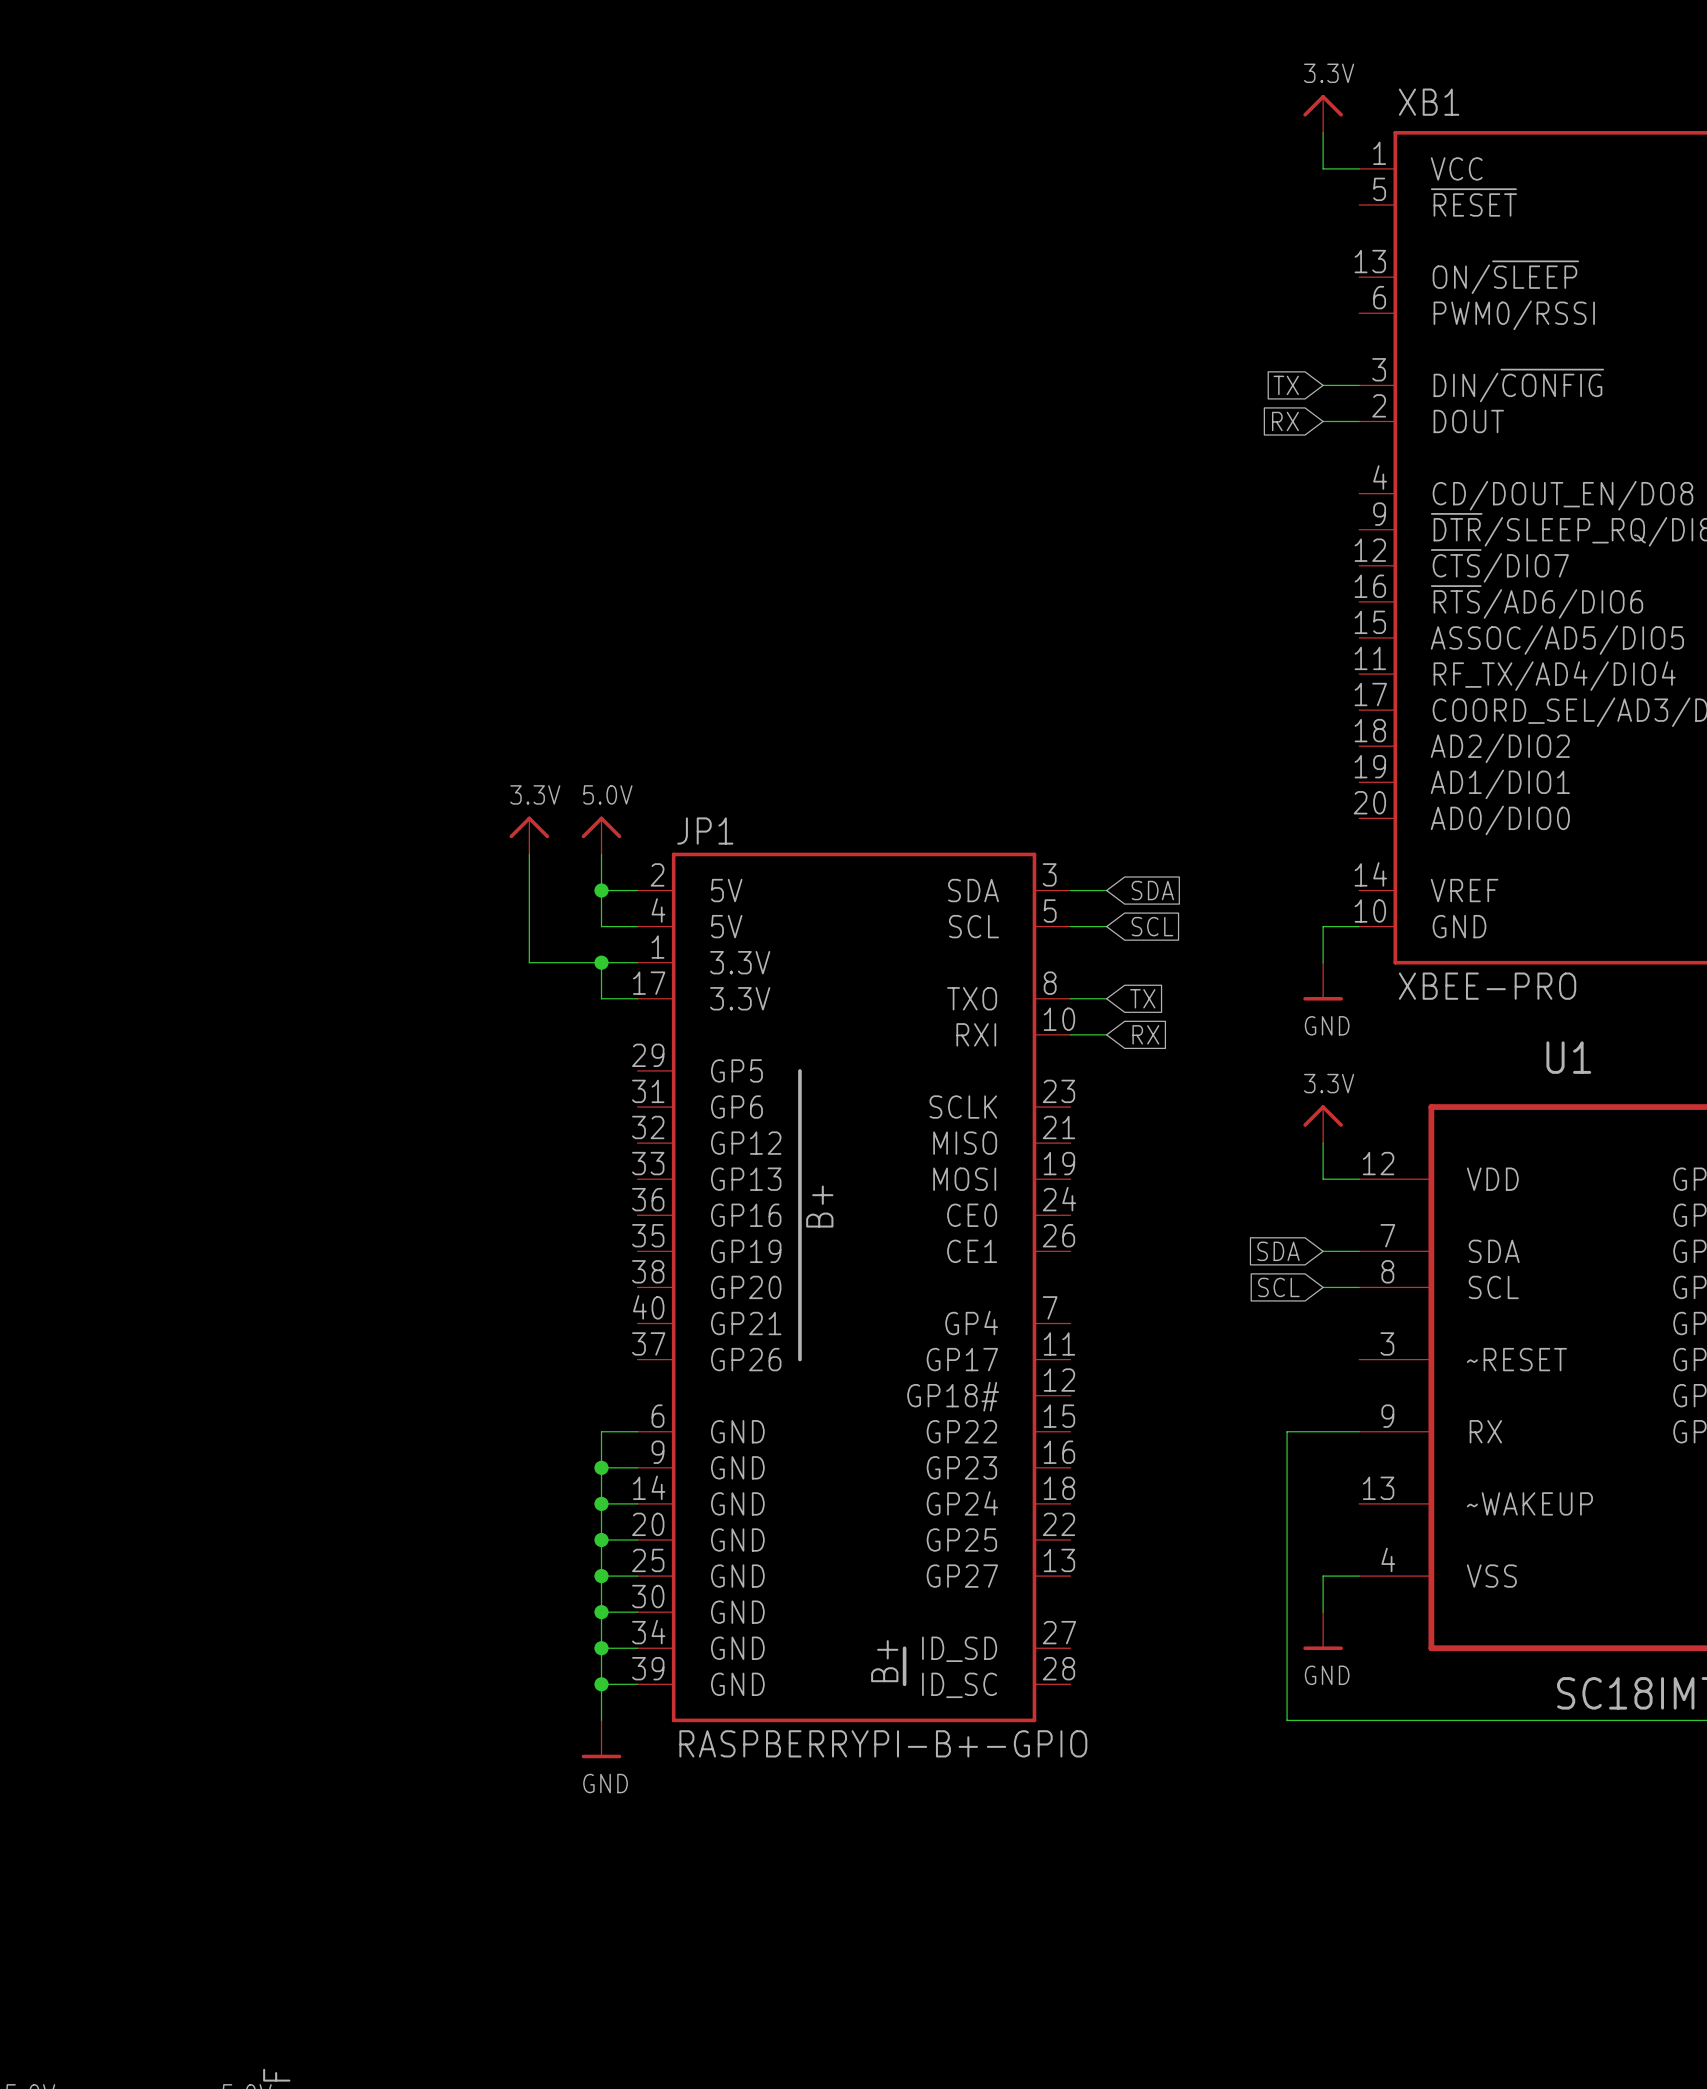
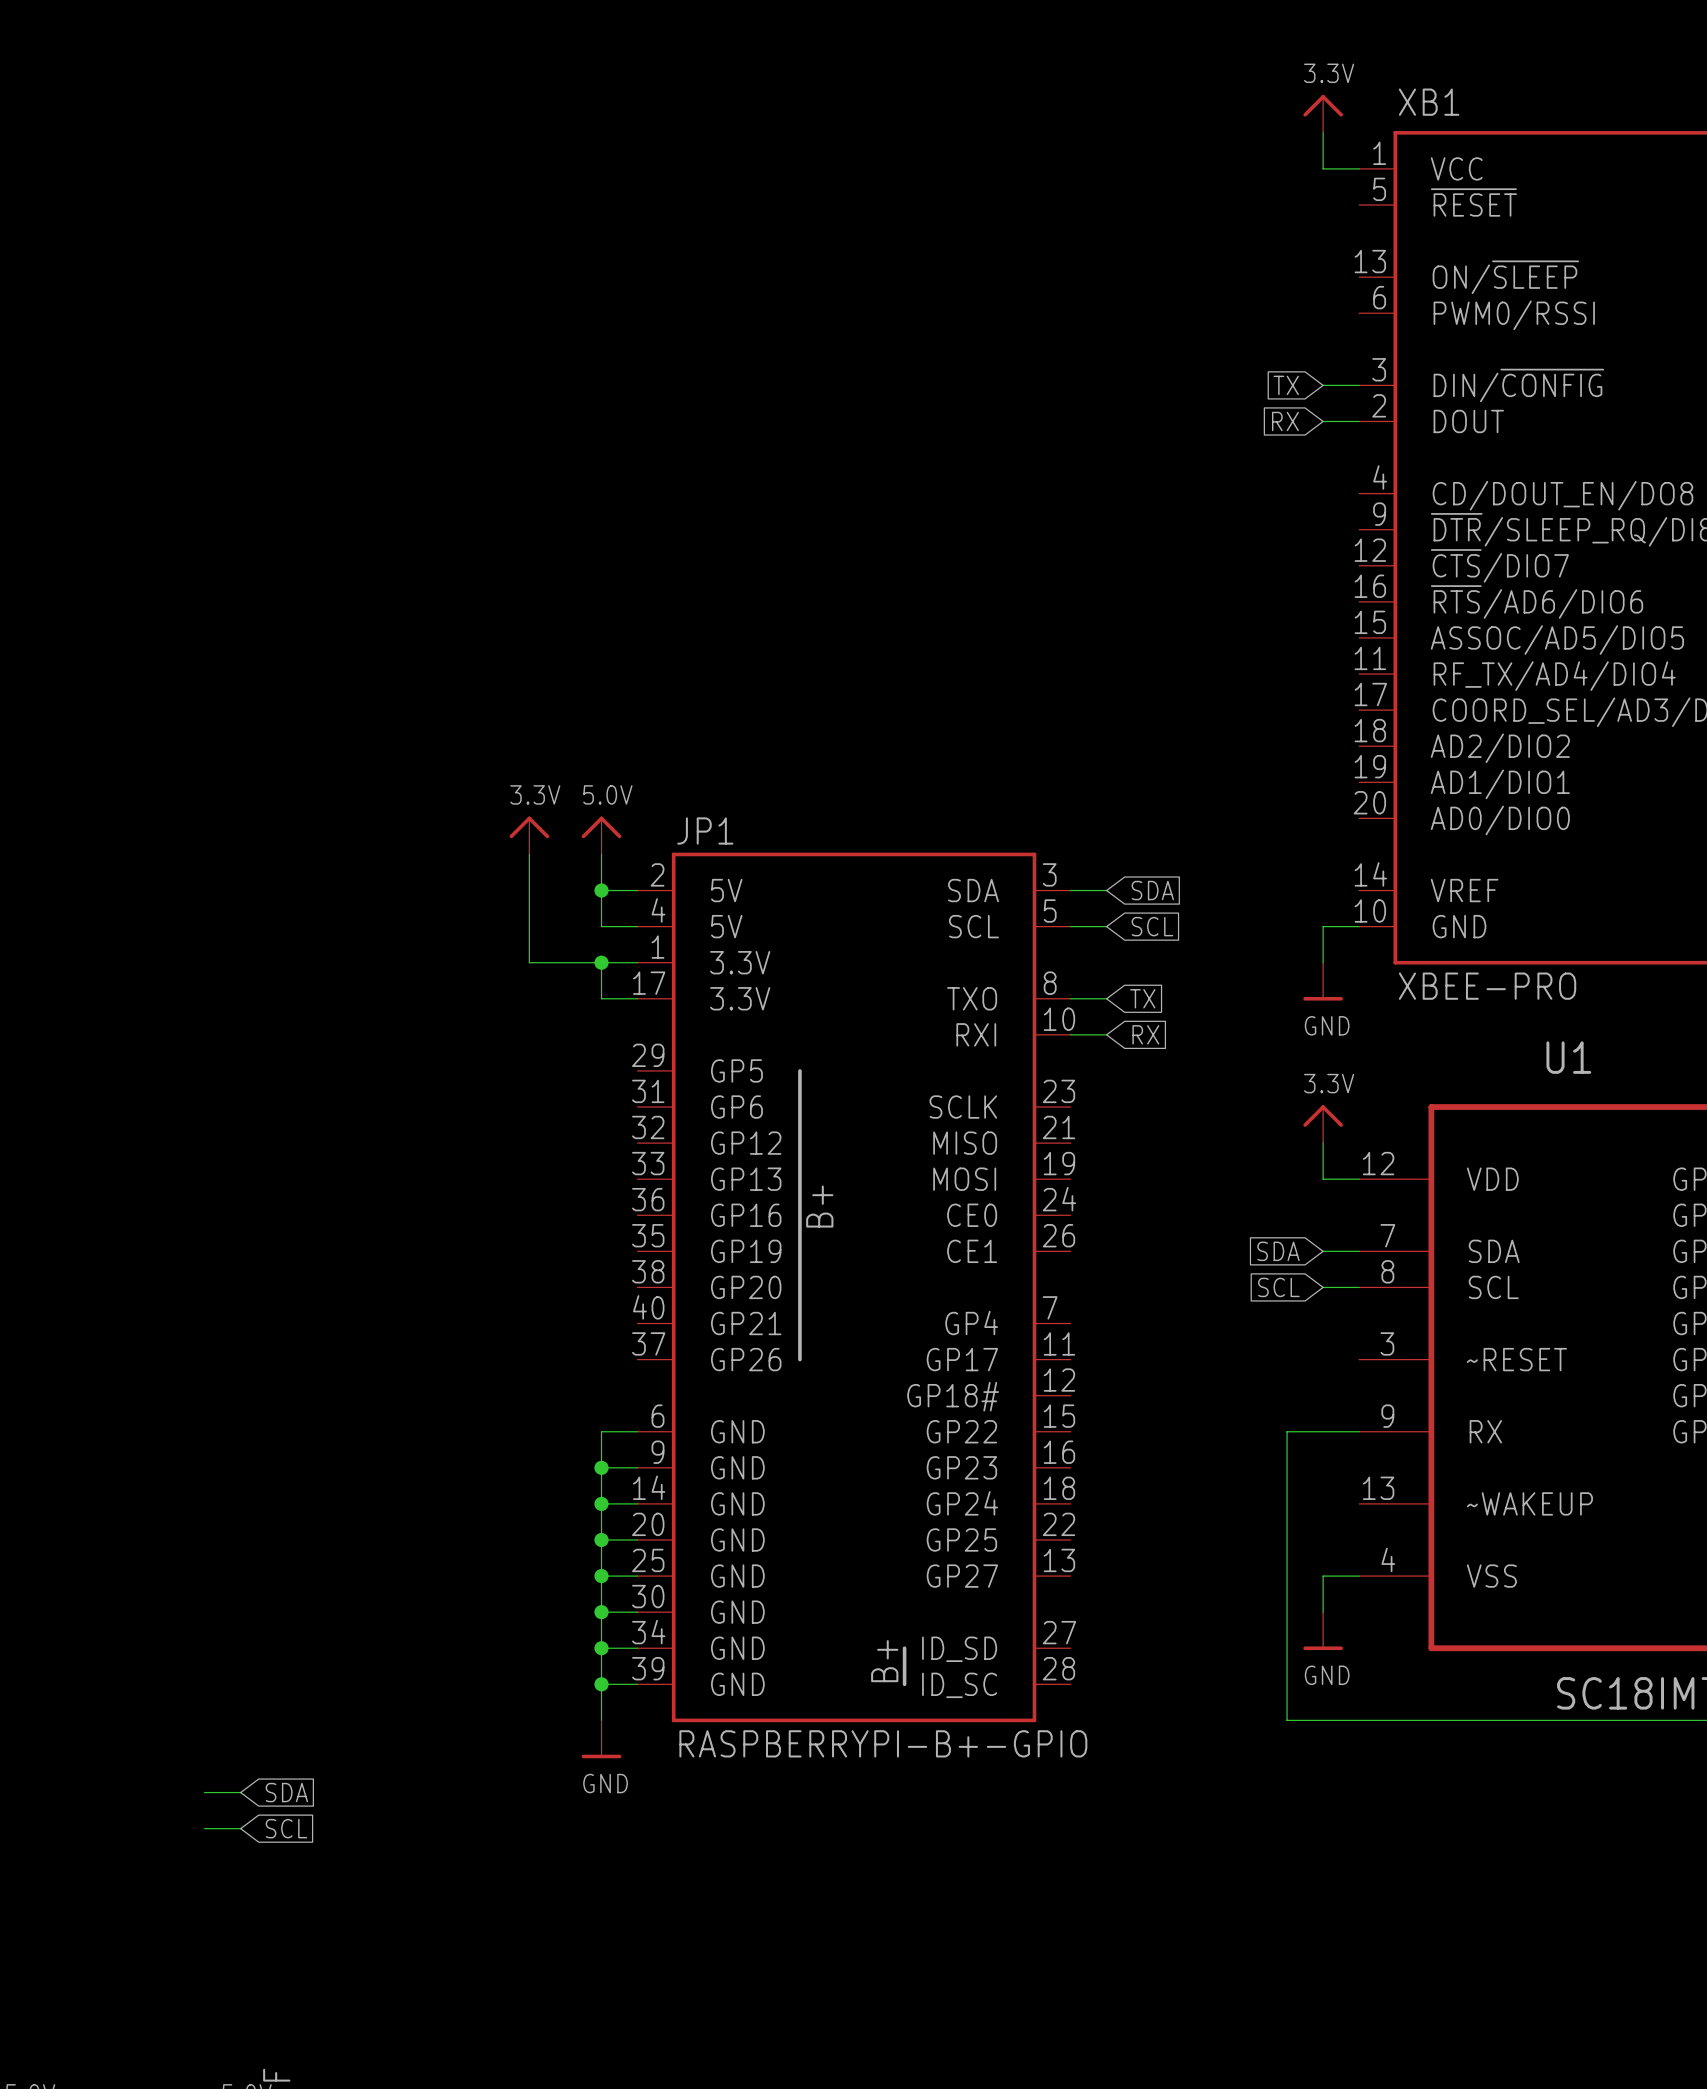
wire: none -> (204, 1792) (240, 1792)
global label: none -> SDA (286, 1792)
wire: none -> (204, 1828) (240, 1828)
global label: none -> SCL (286, 1828)

